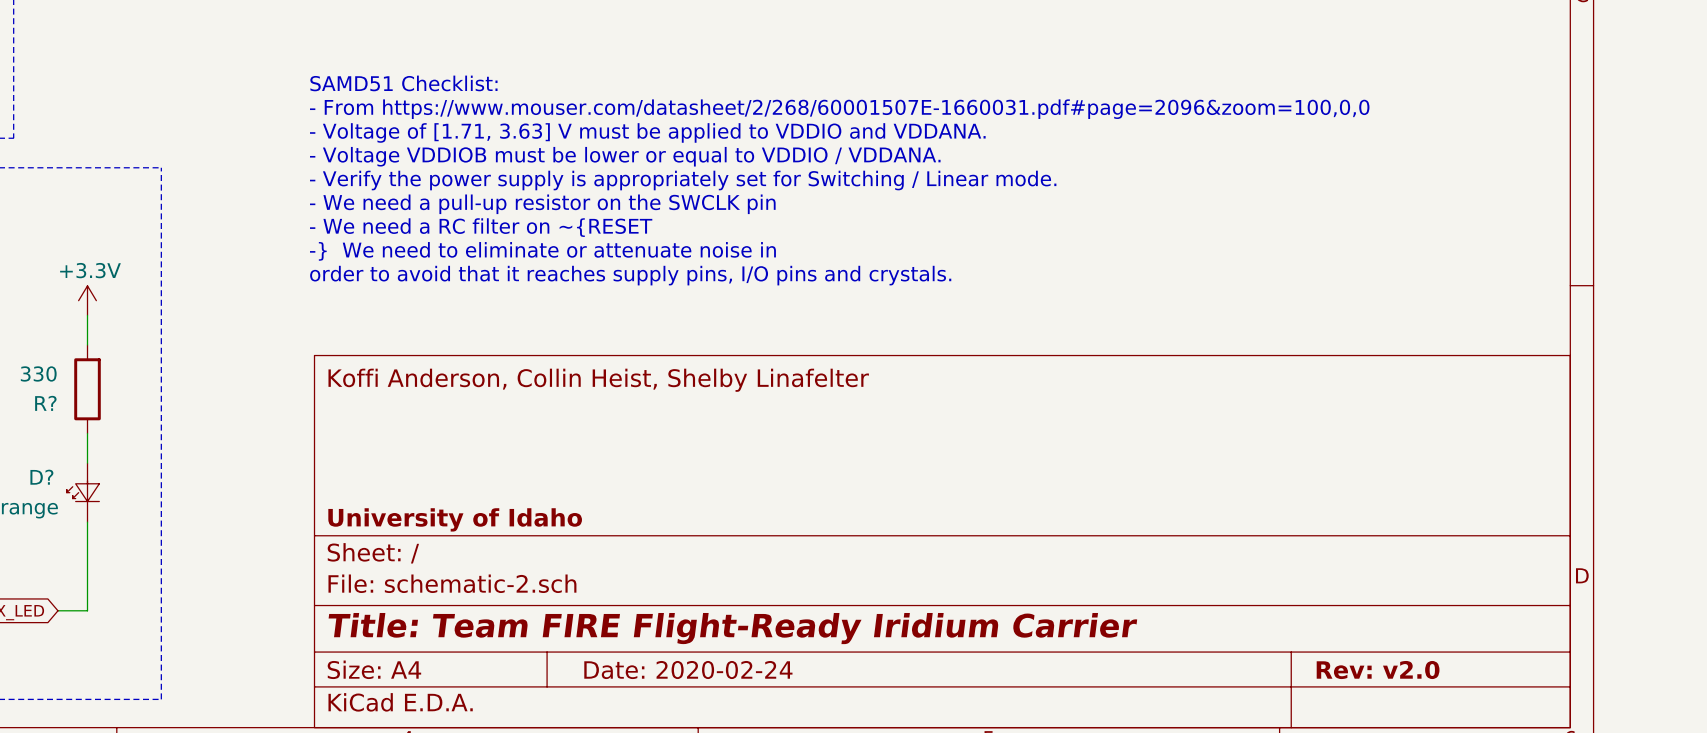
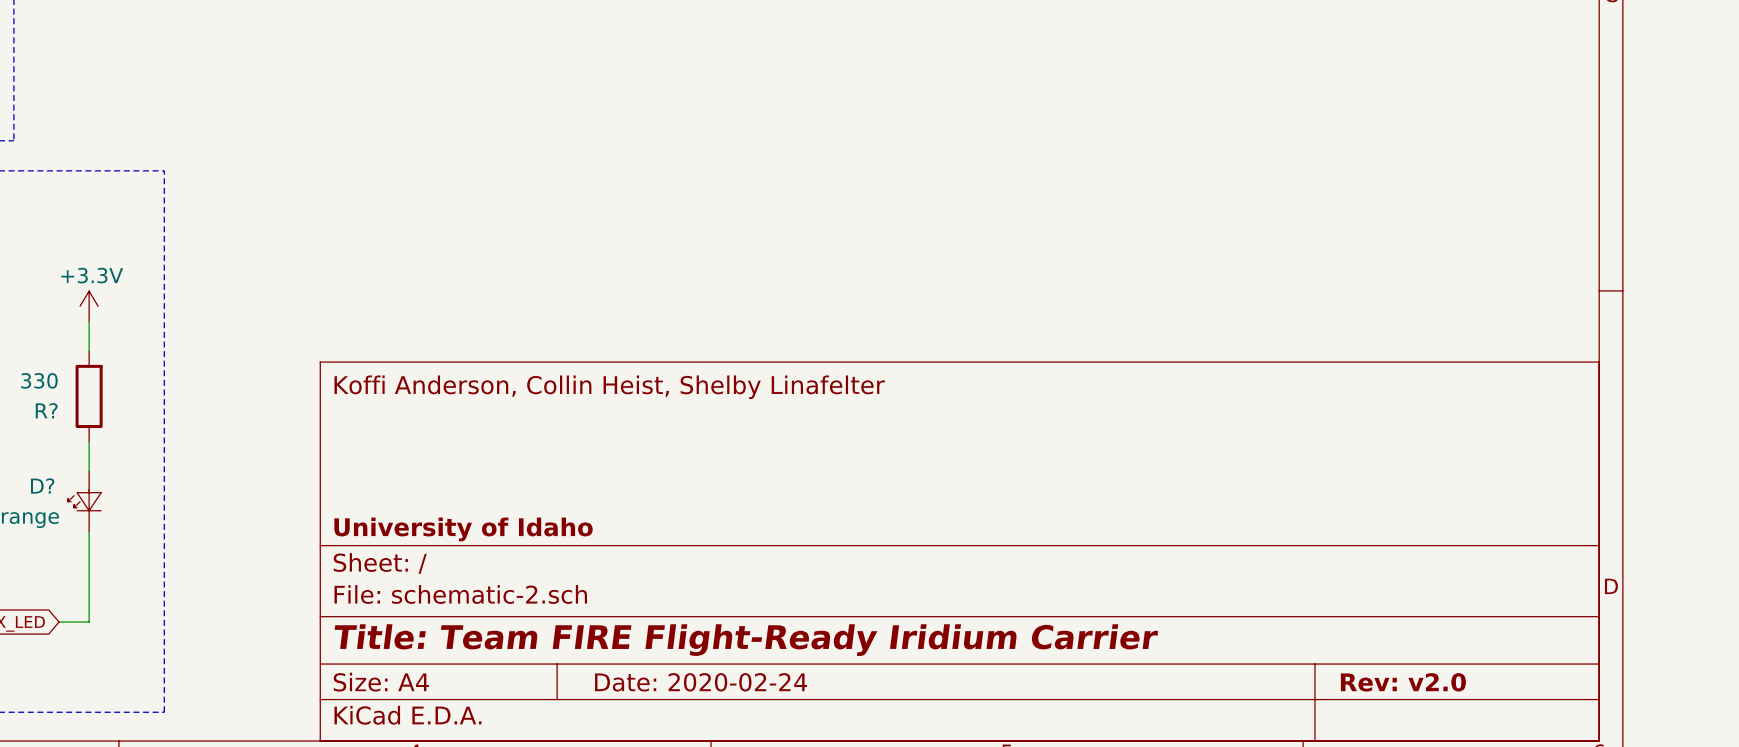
text: SAMD51 Checklist: (403, 83) -> none
text: - From https://www.mouser.com/datasheet/2/268/60001507E-1660031.pdf#page=2096&zoom=100,0,0 (839, 109) -> none
text: - Voltage of [1.71, 3.63] V must be applied to VDDIO and VDDANA. (647, 132) -> none
text: - Voltage VDDIOB must be lower or equal to VDDIO / VDDANA. (625, 156) -> none
text: - Verify the power supply is appropriately set for Switching / Linear mode. (683, 180) -> none
text: - We need a pull-up resistor on the SWCLK pin (542, 204) -> none
text: - We need a RC filter on ~{RESET (481, 227) -> none
text: -} We need to eliminate or attenuate noise in (542, 251) -> none
text: order to avoid that it reaches supply pins, I/O pins and crystals. (630, 275) -> none

